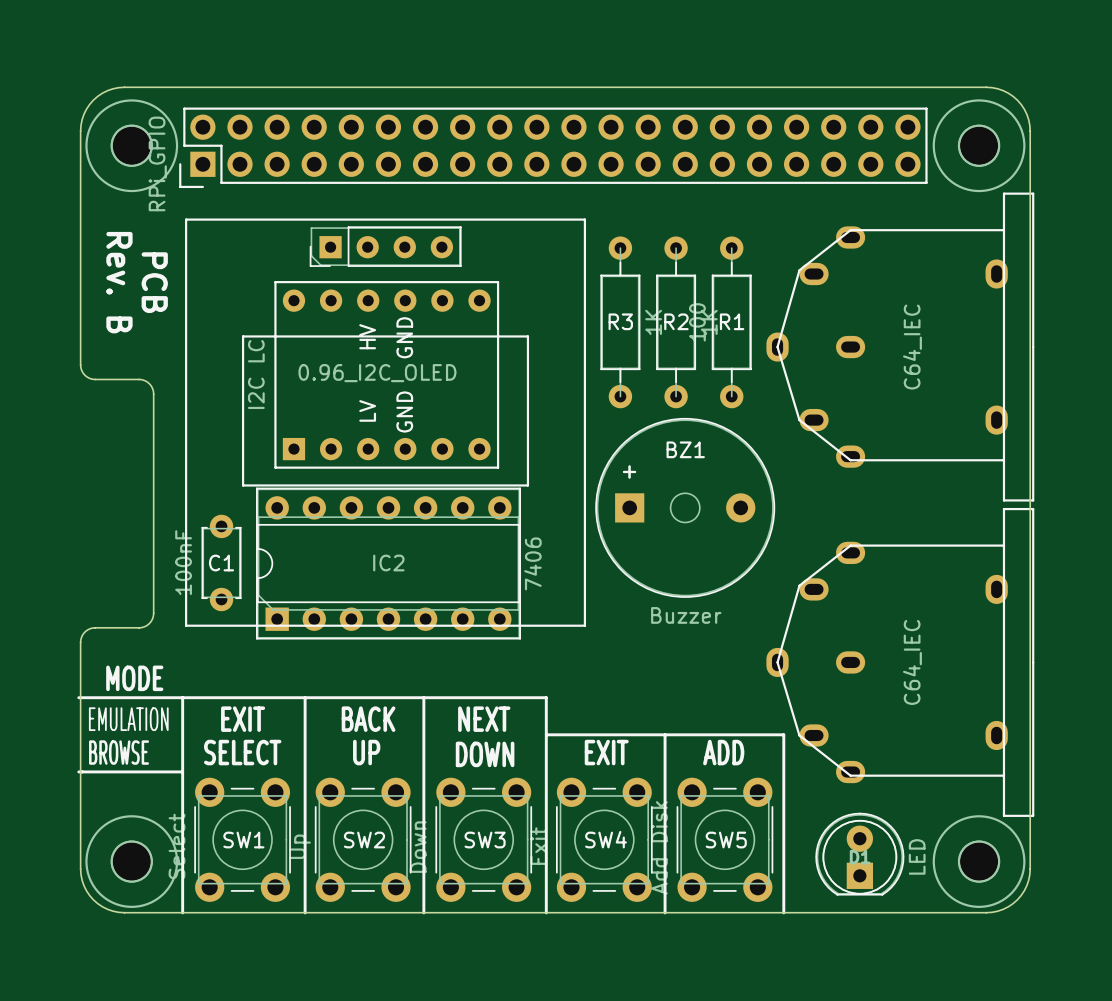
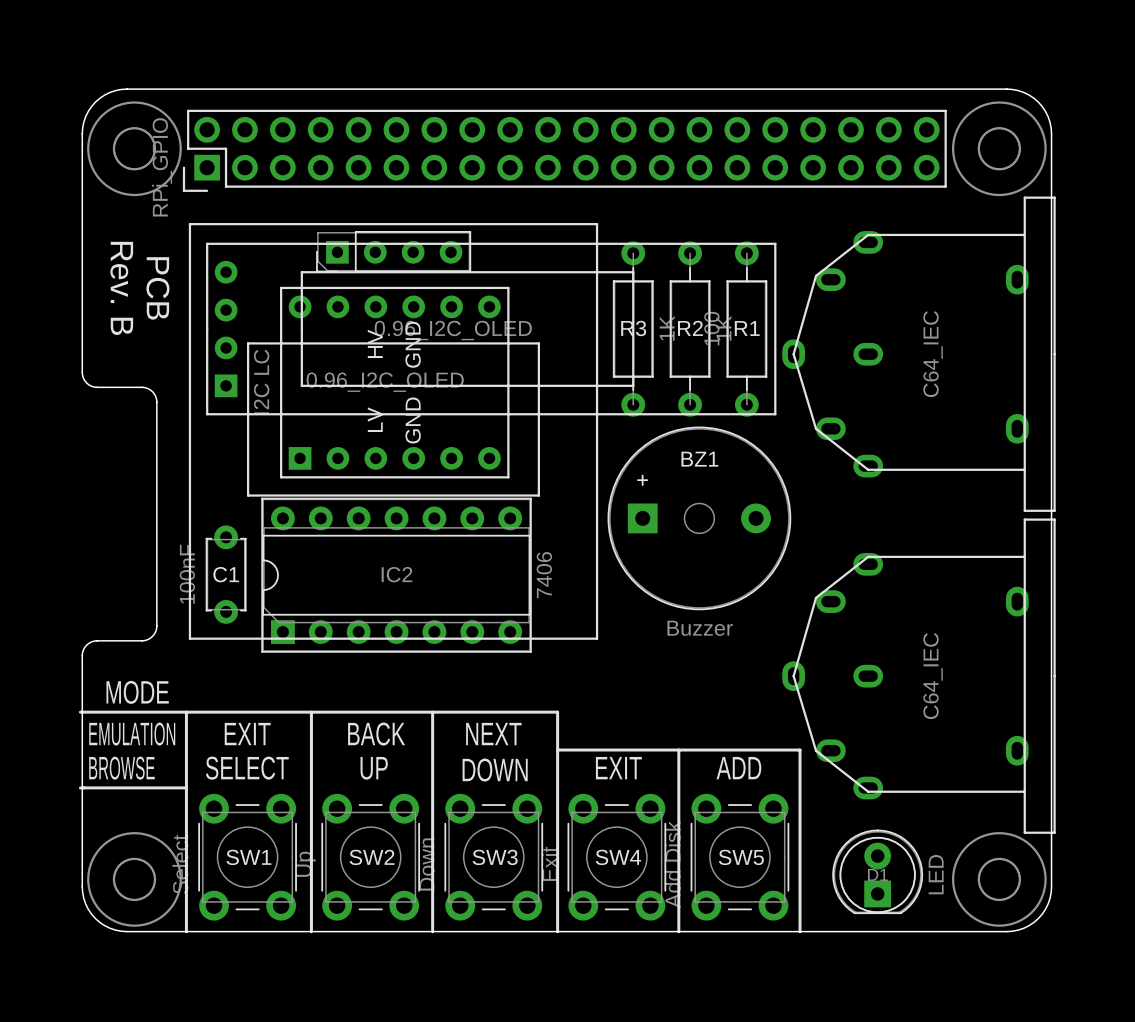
part: none -> 0.96_I2C_OLED (491, 329)

